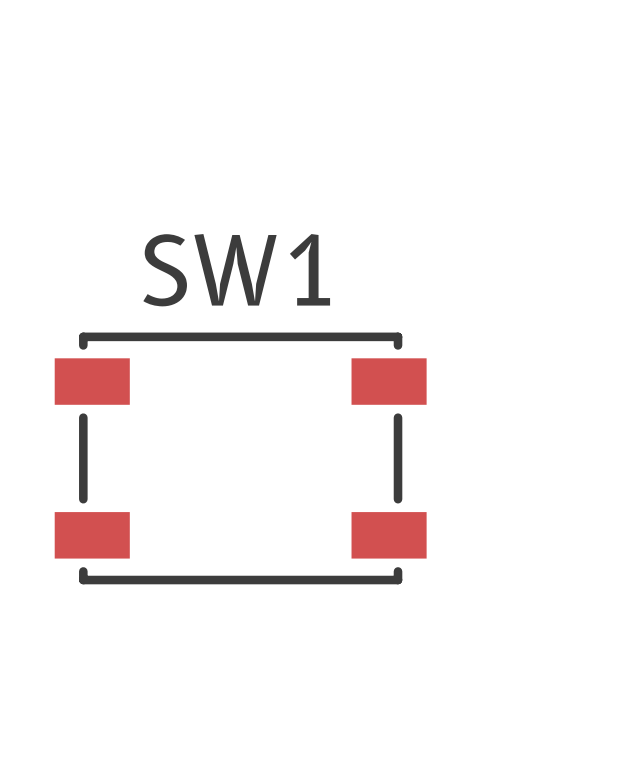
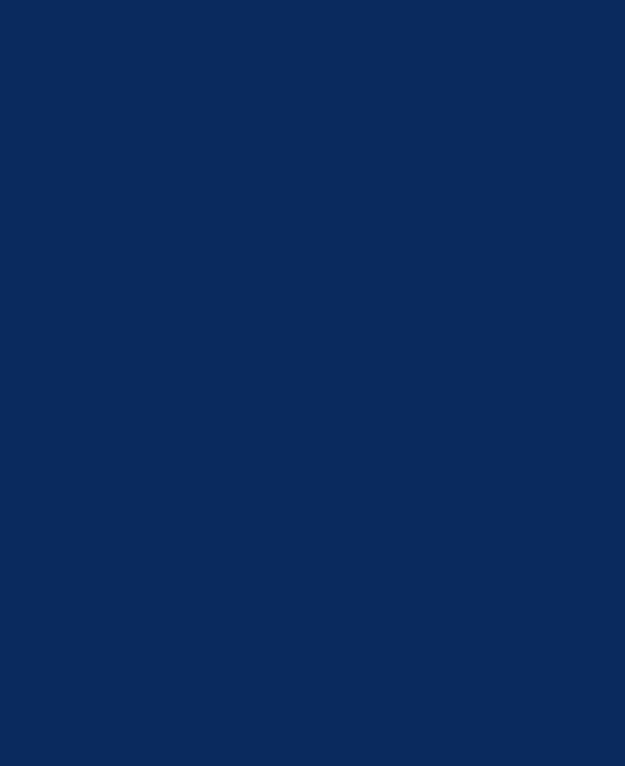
SW1: (240, 458) -> none

